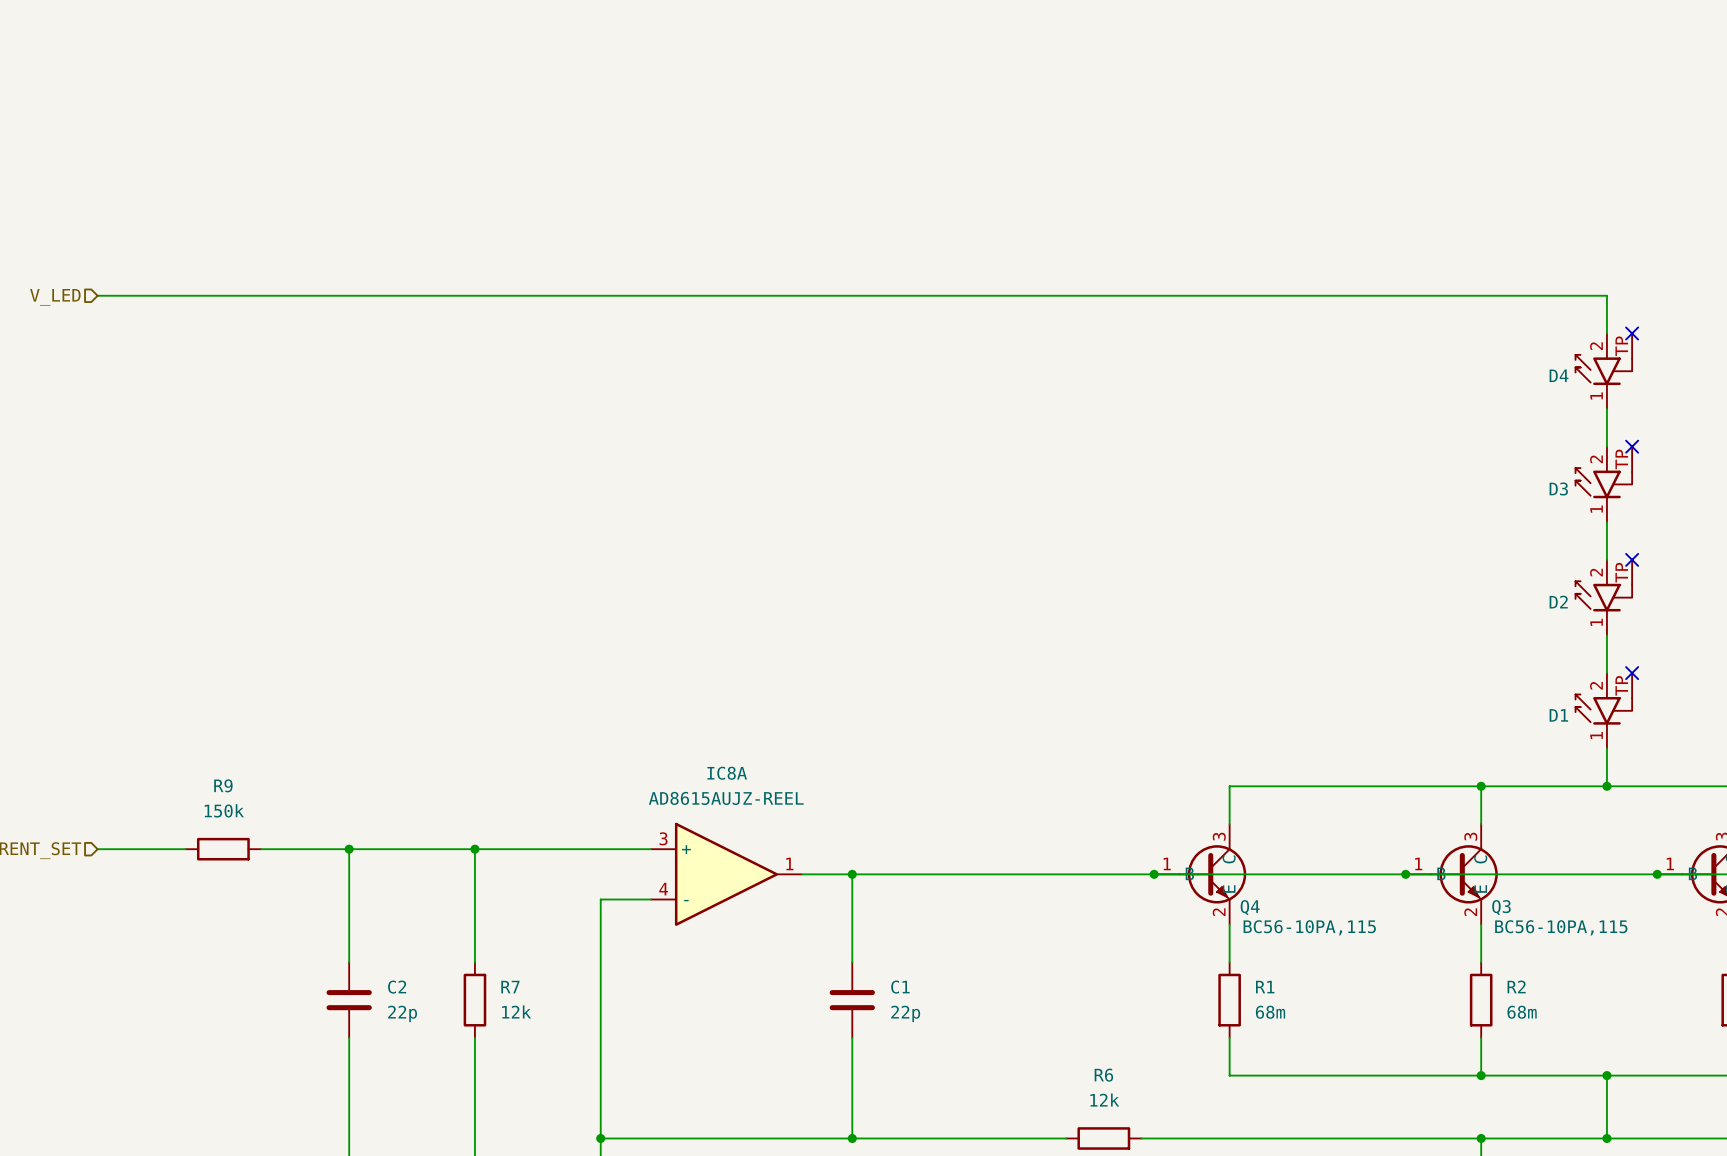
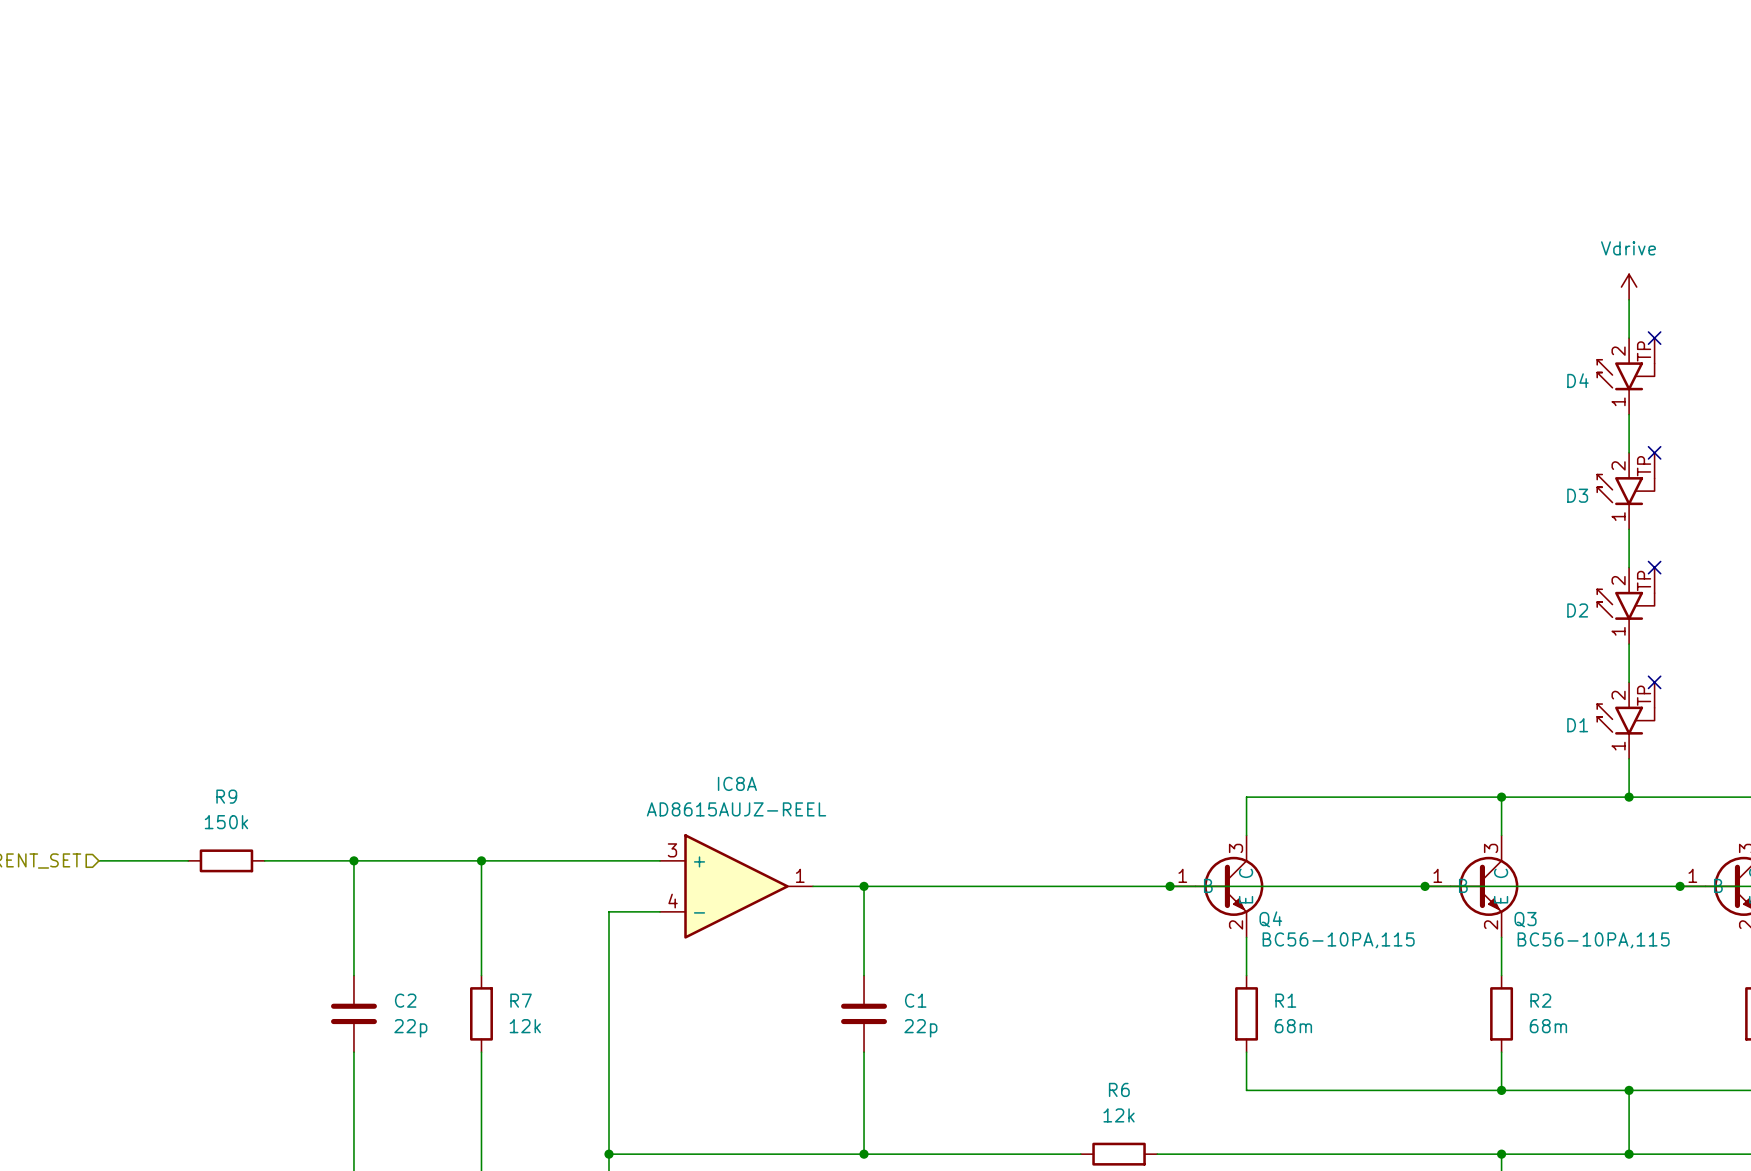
power symbol: none -> Vdrive (1629, 287)
wire: (97, 295) (1606, 295) -> none
hierarchical label: V_LED (55, 297) -> none

